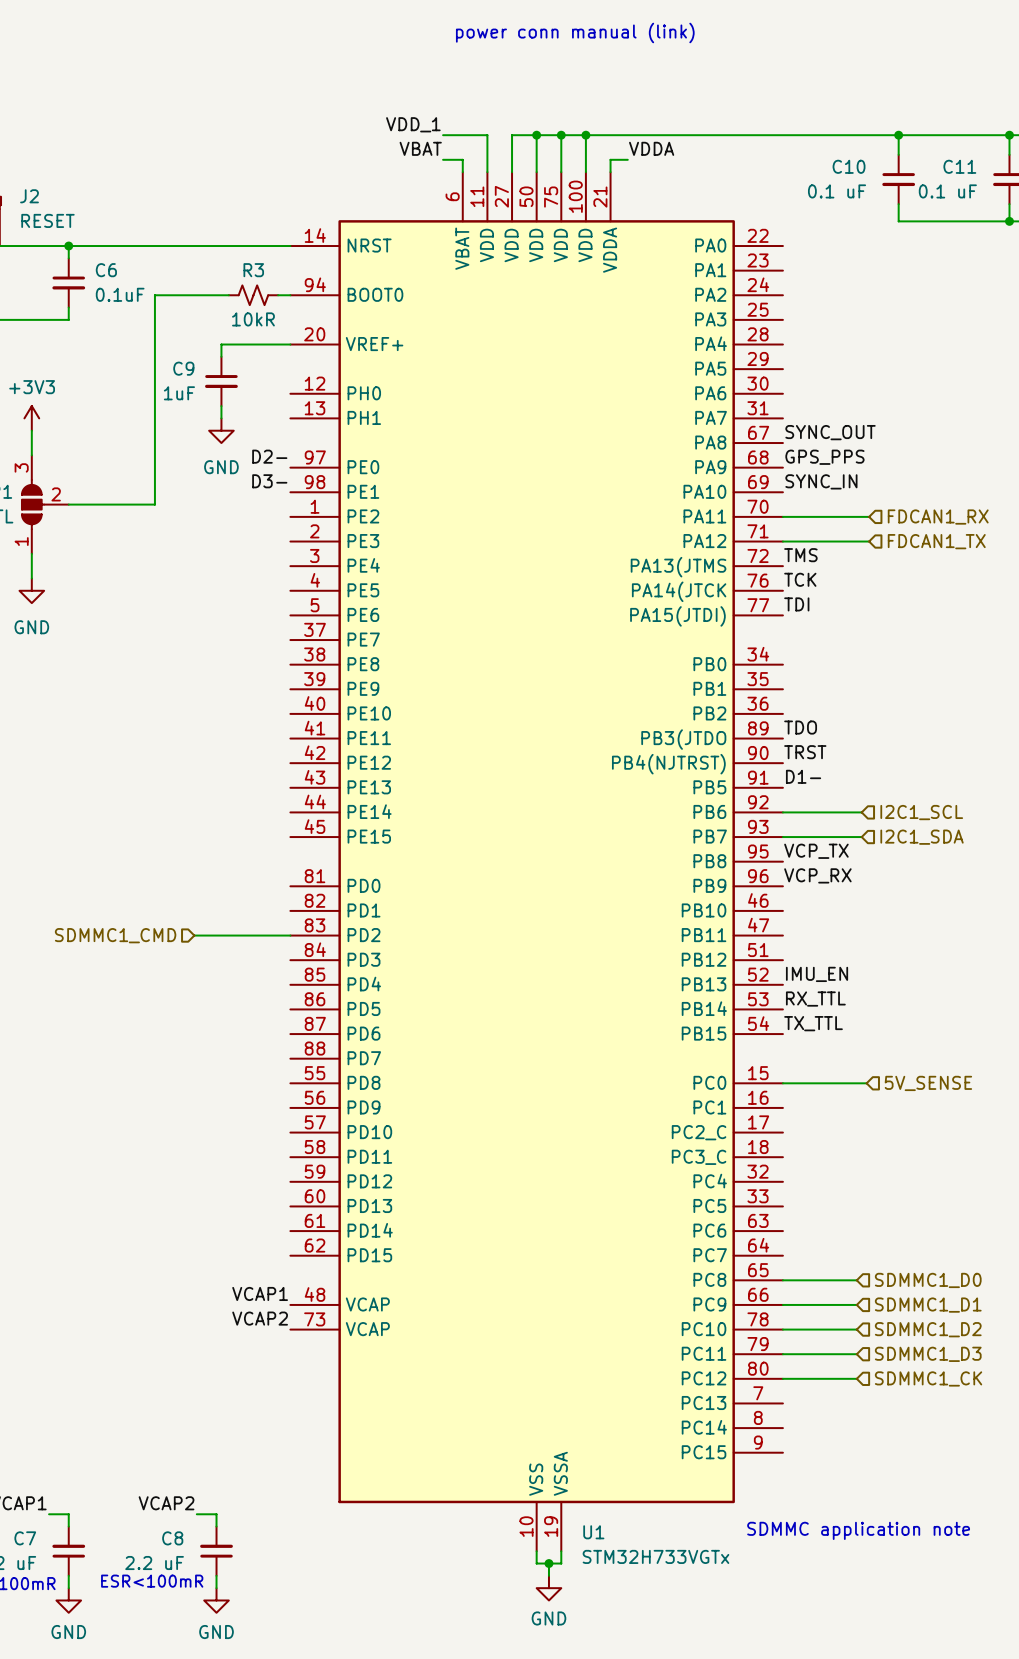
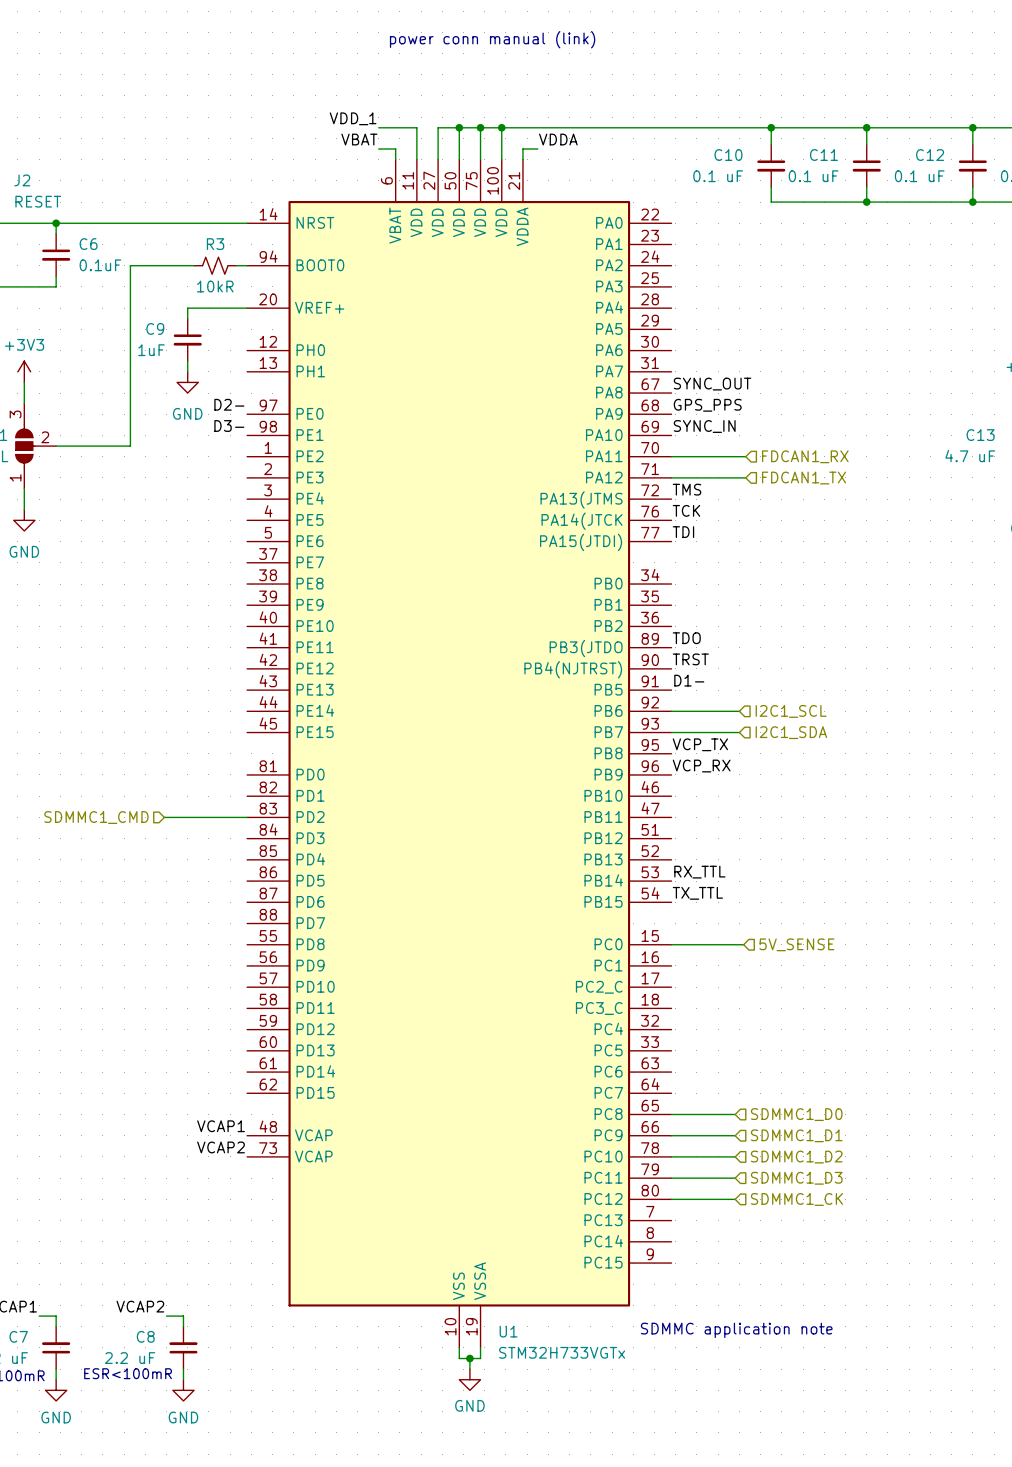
label: IMU_EN (817, 974) -> none

